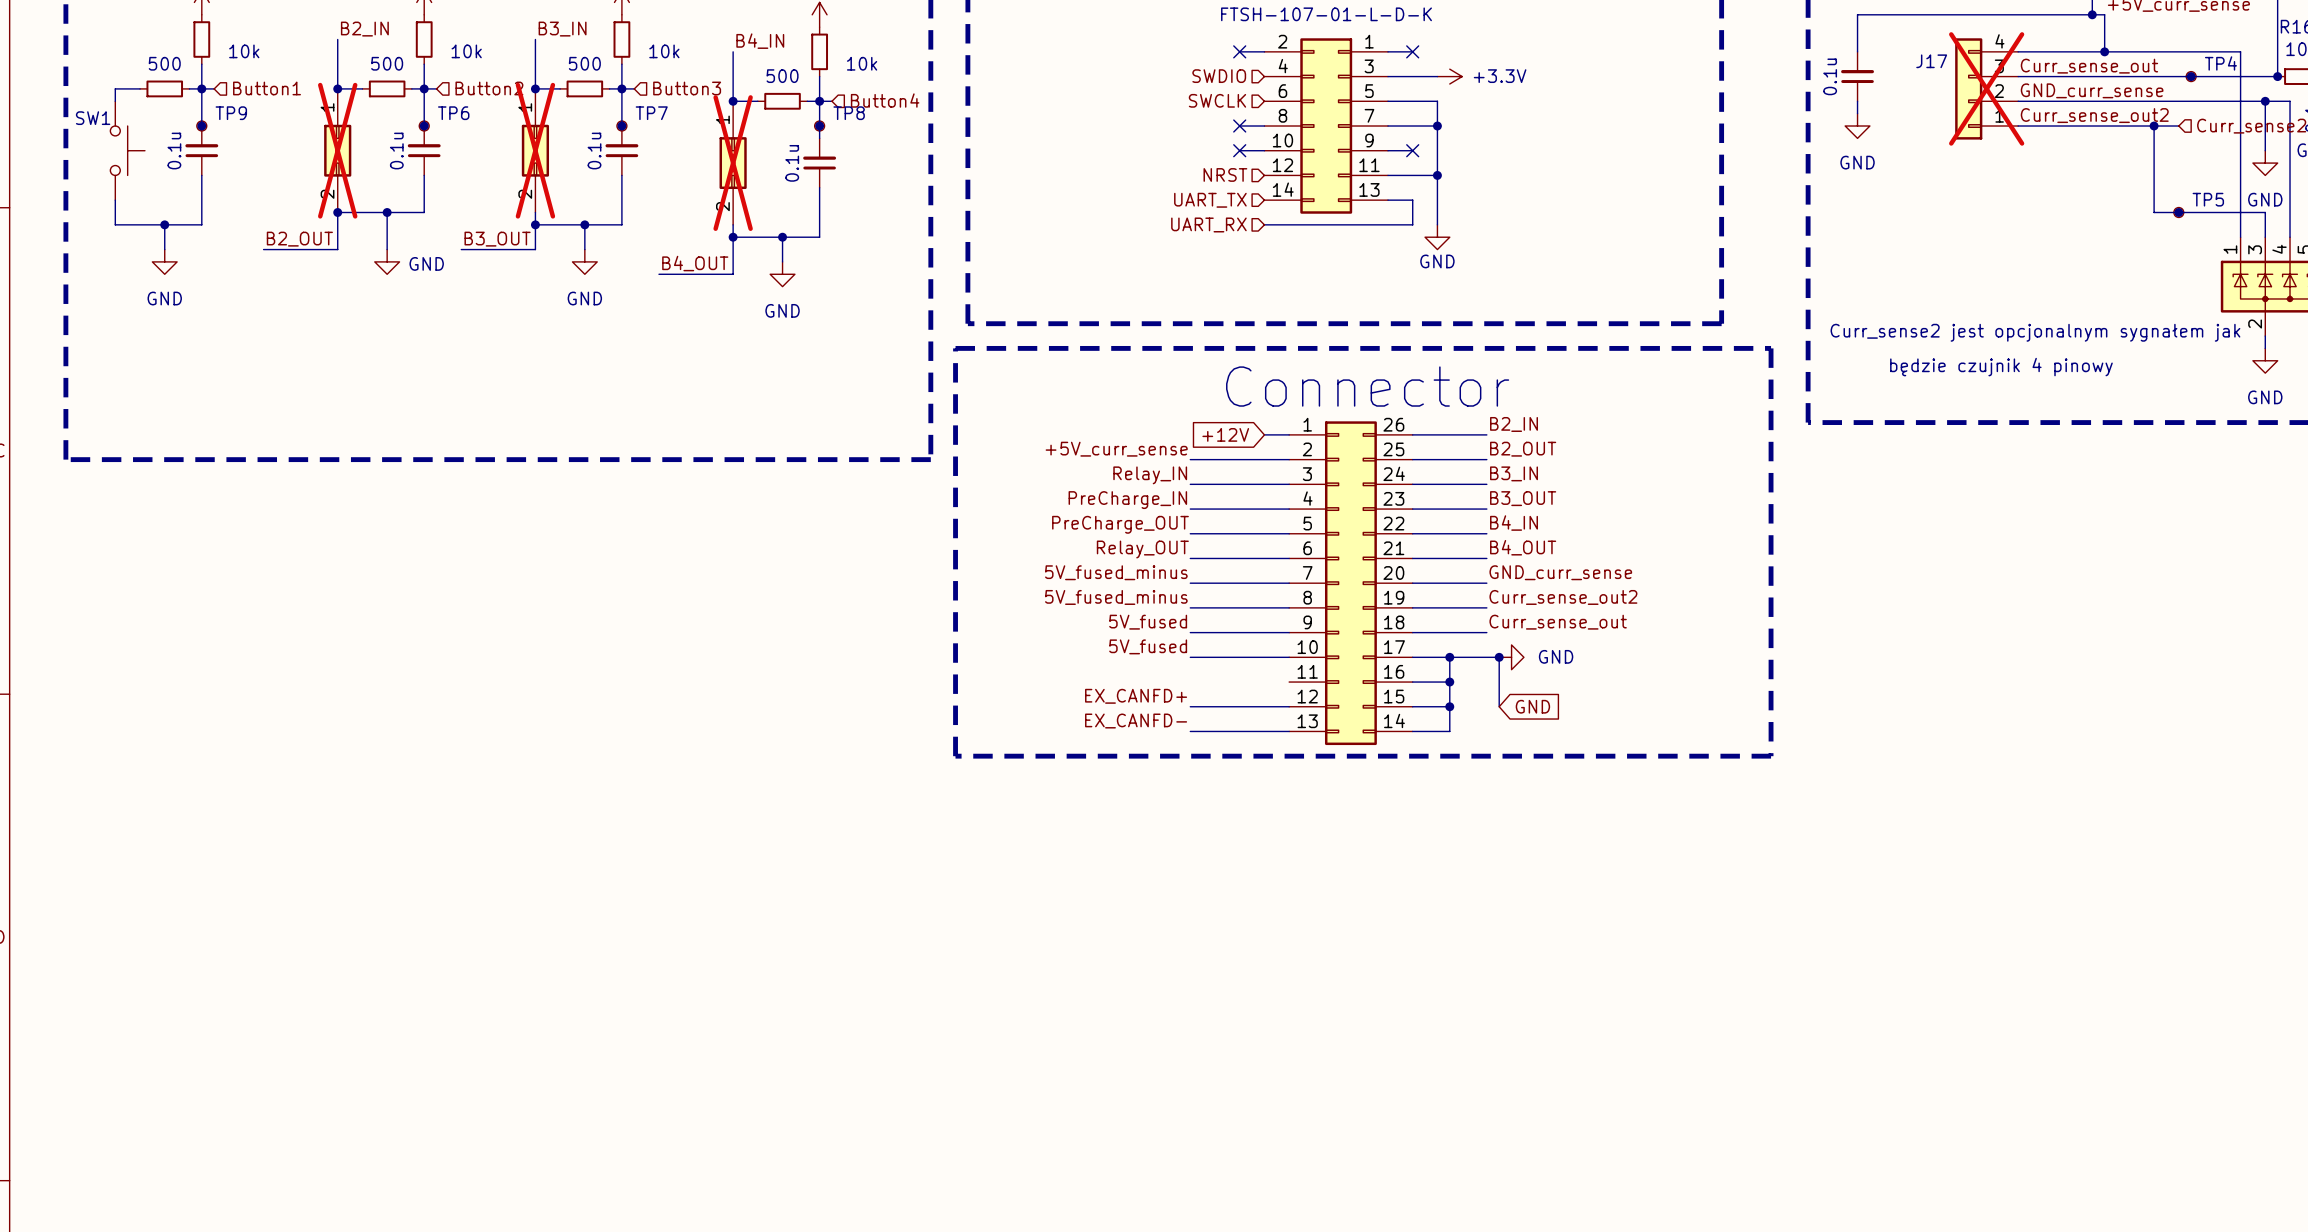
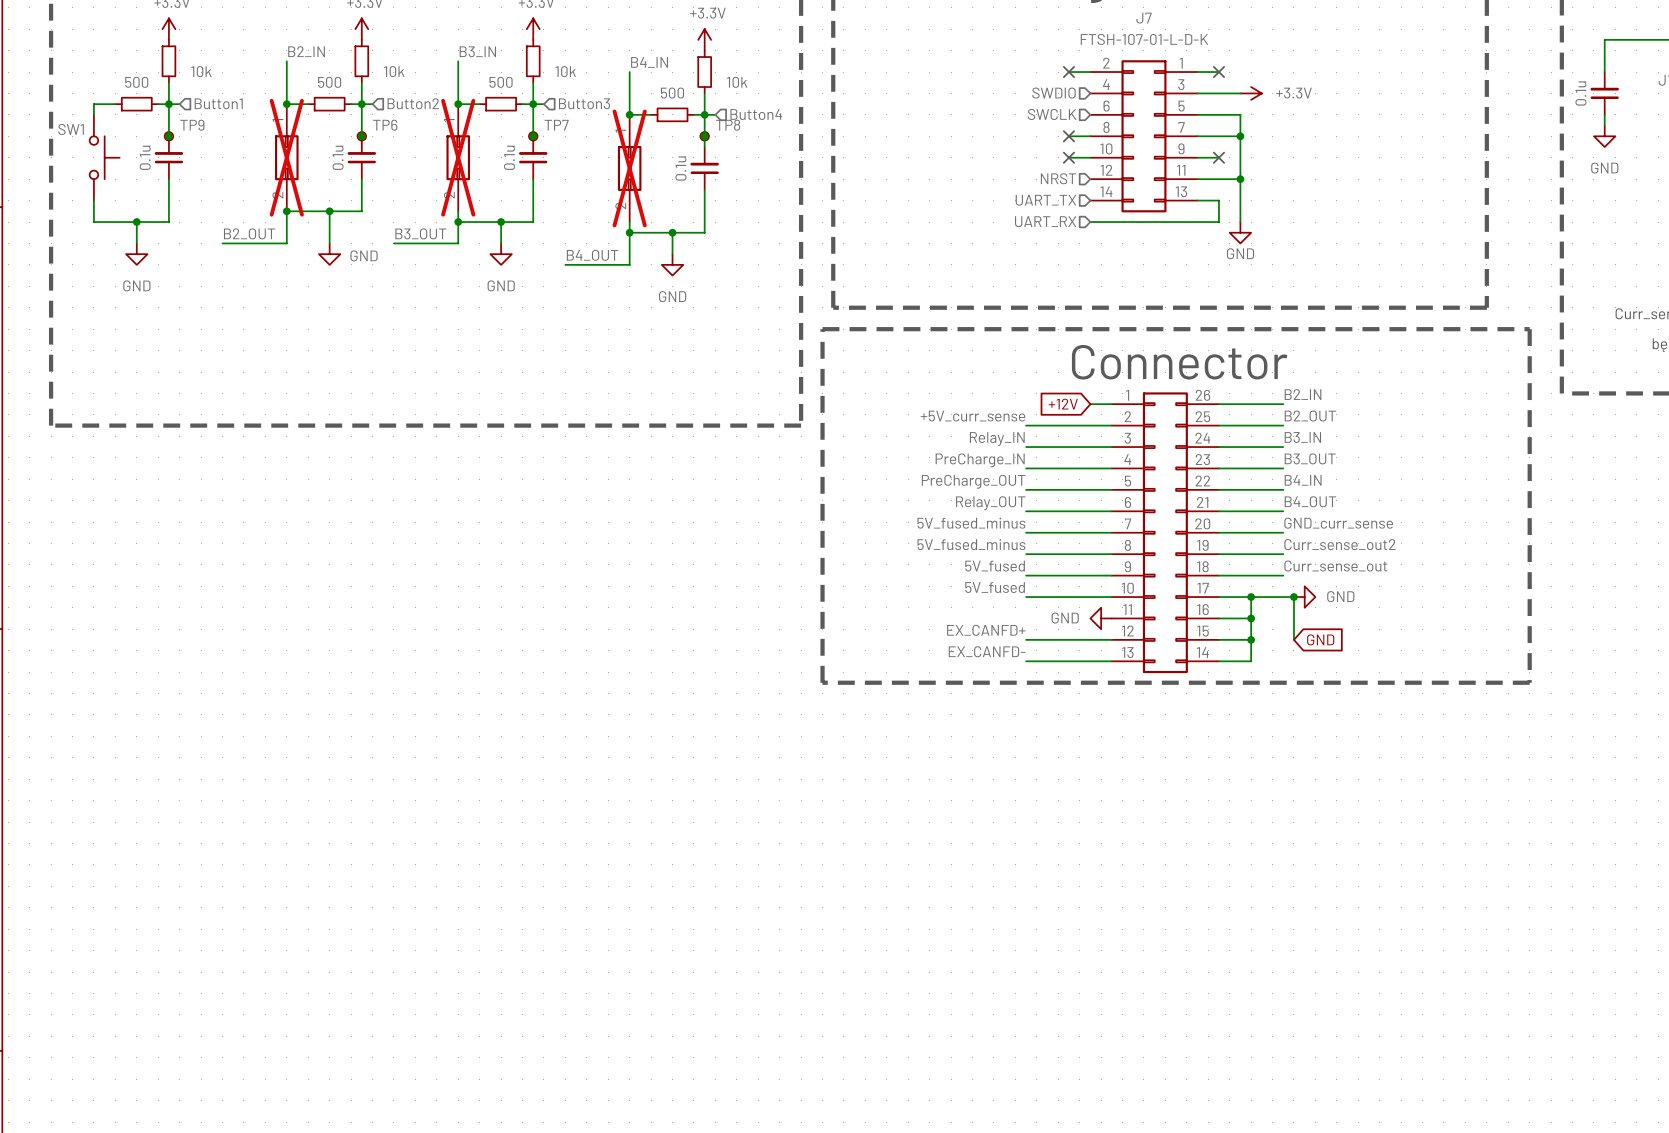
power symbol: none -> GND (1101, 618)

